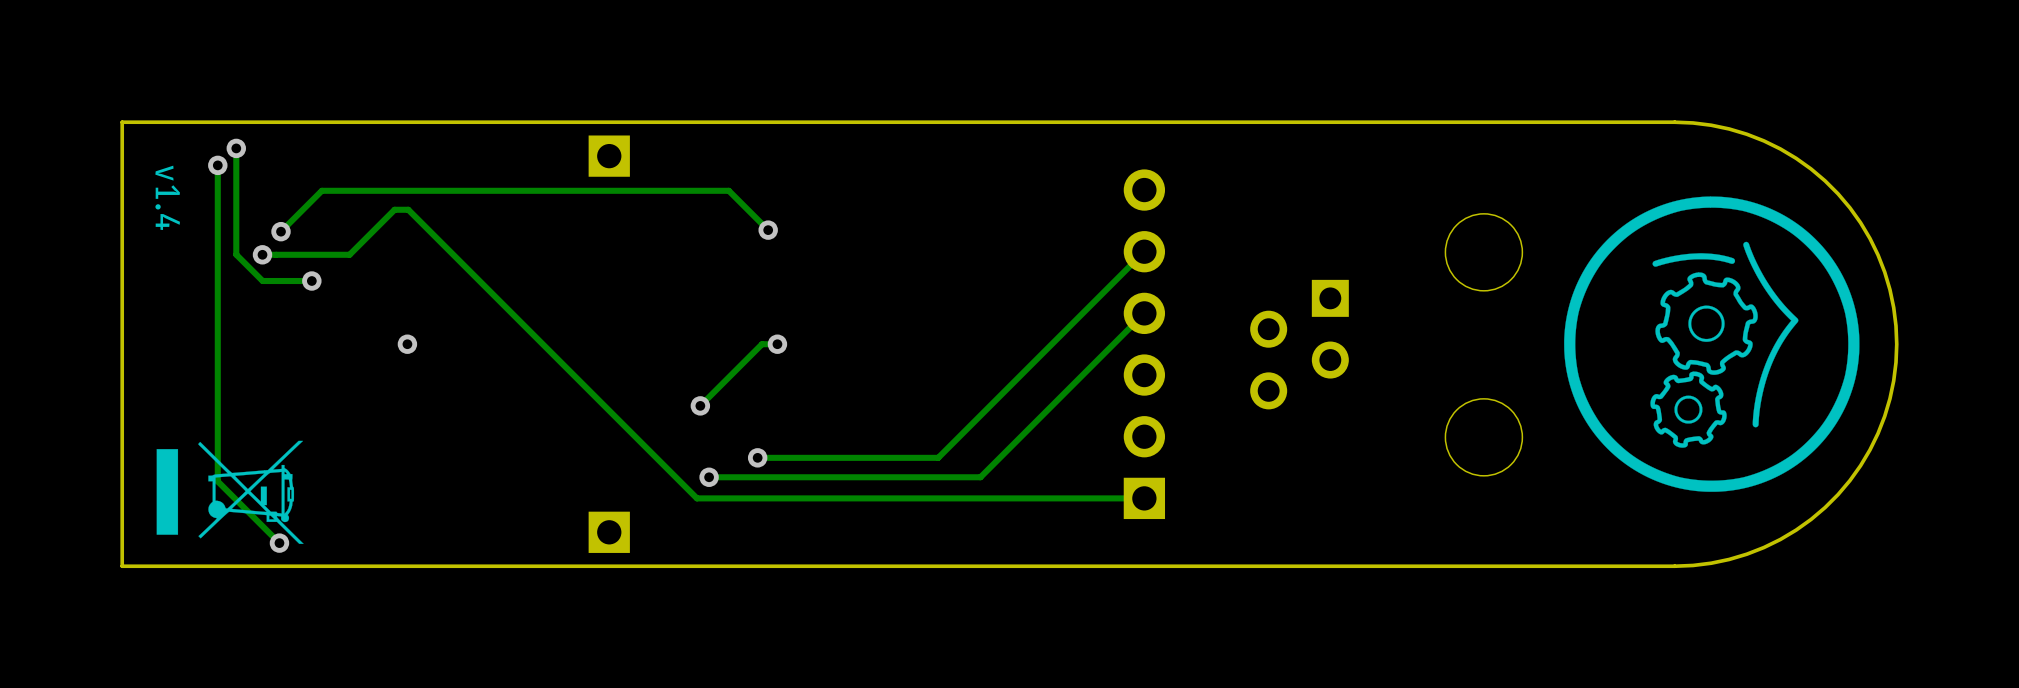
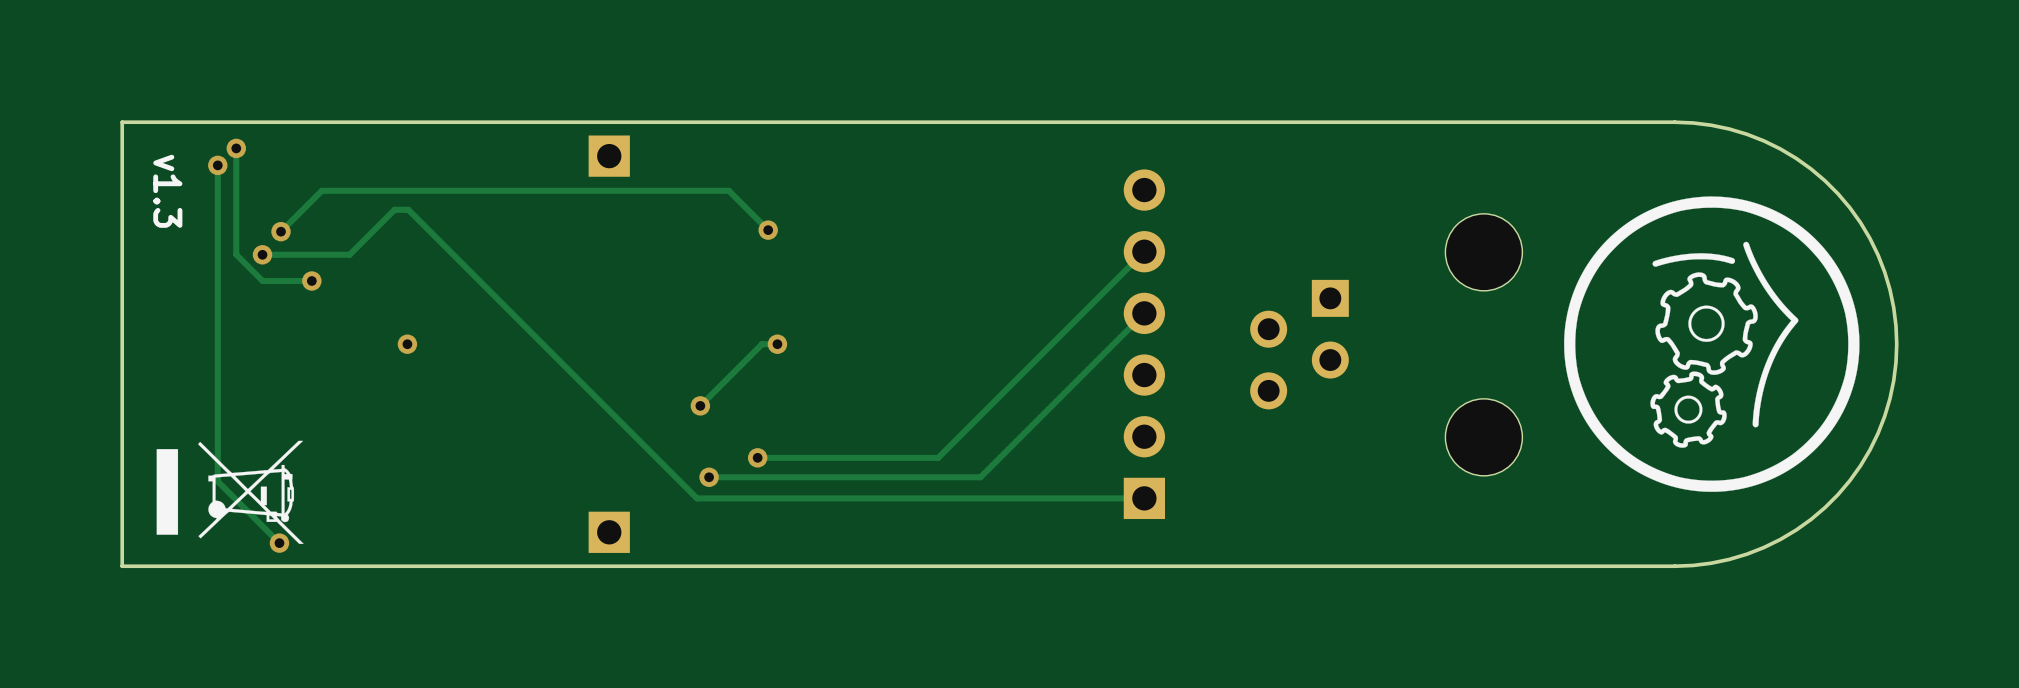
text: v1.4 (167, 197) -> v1.3 (167, 191)

